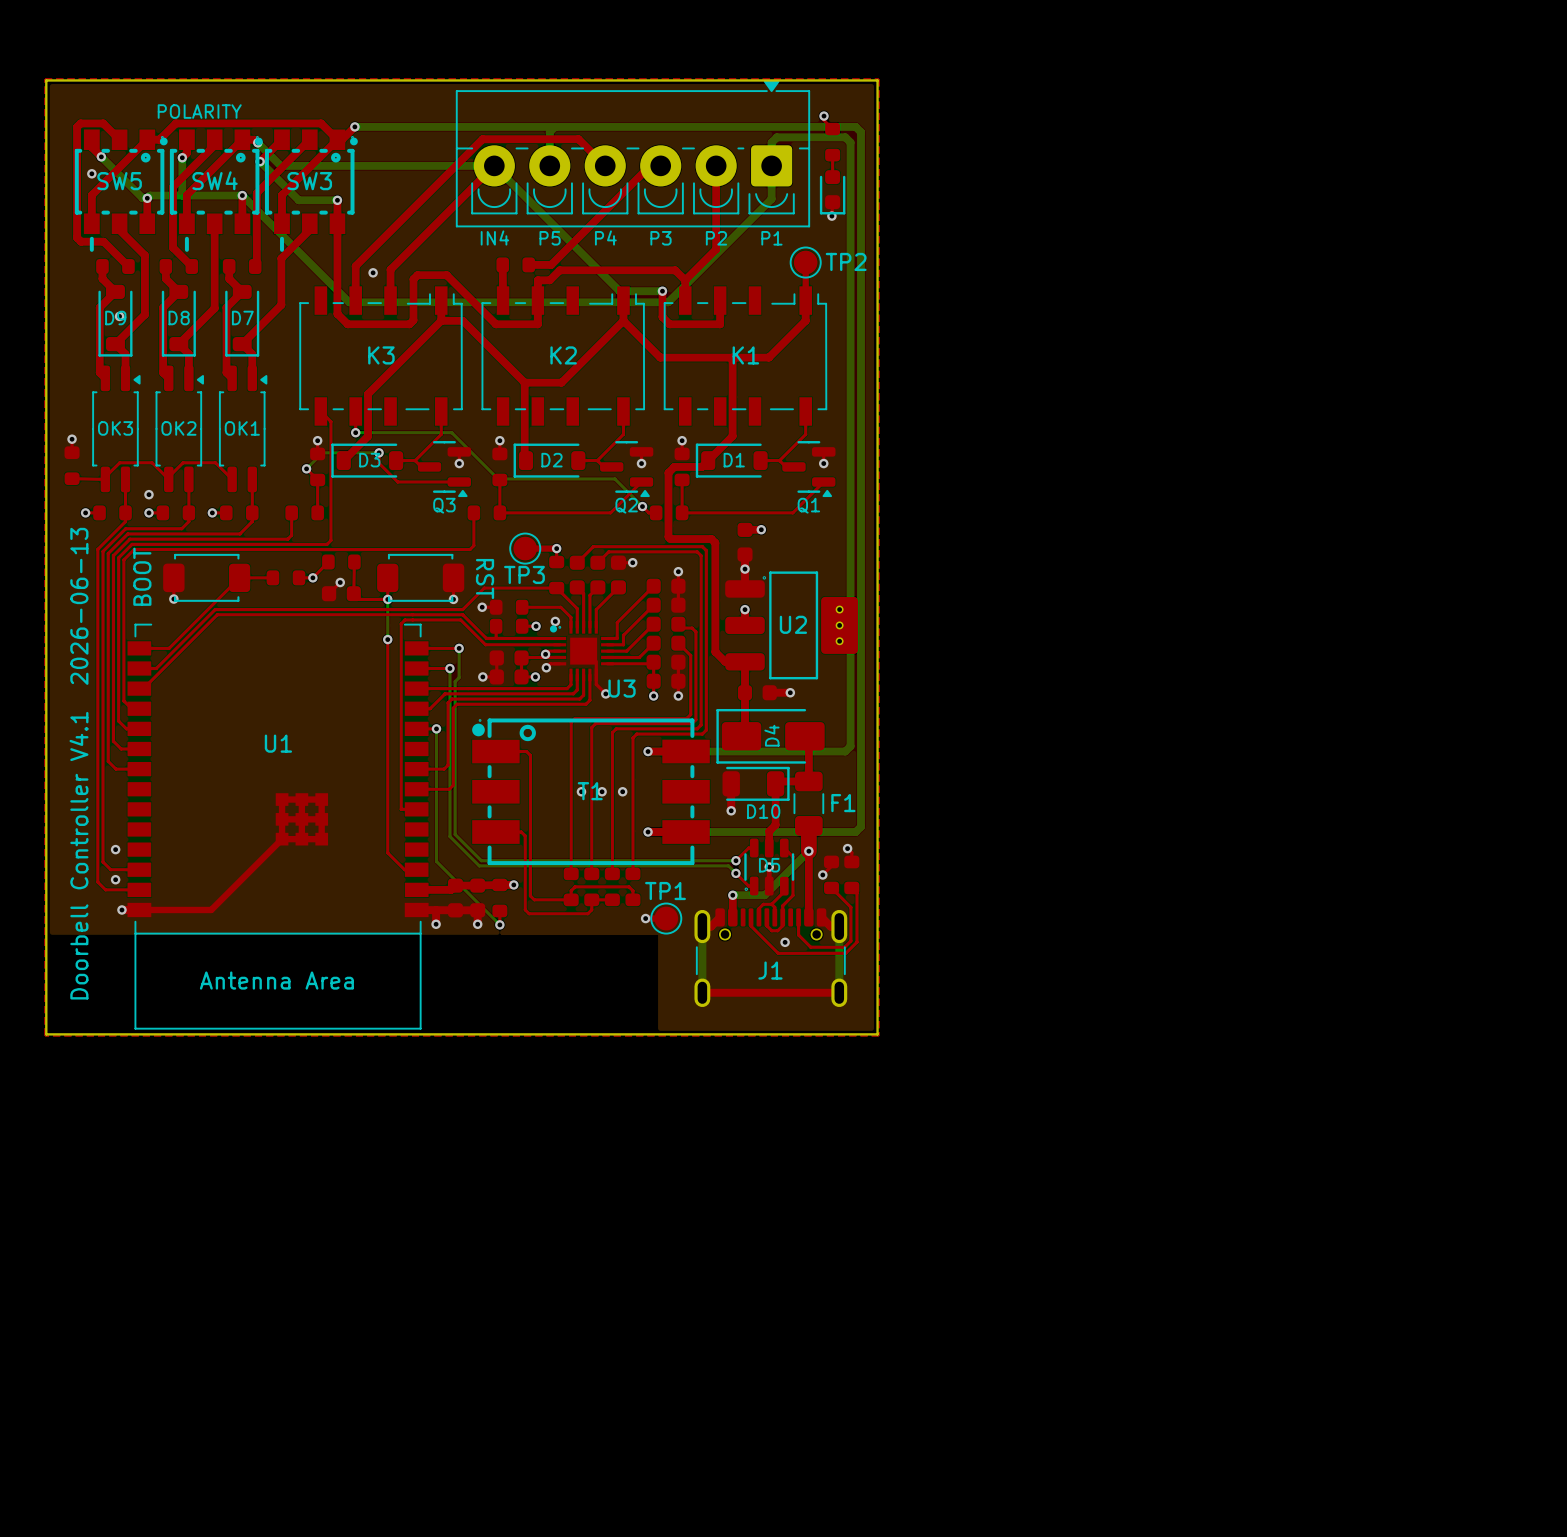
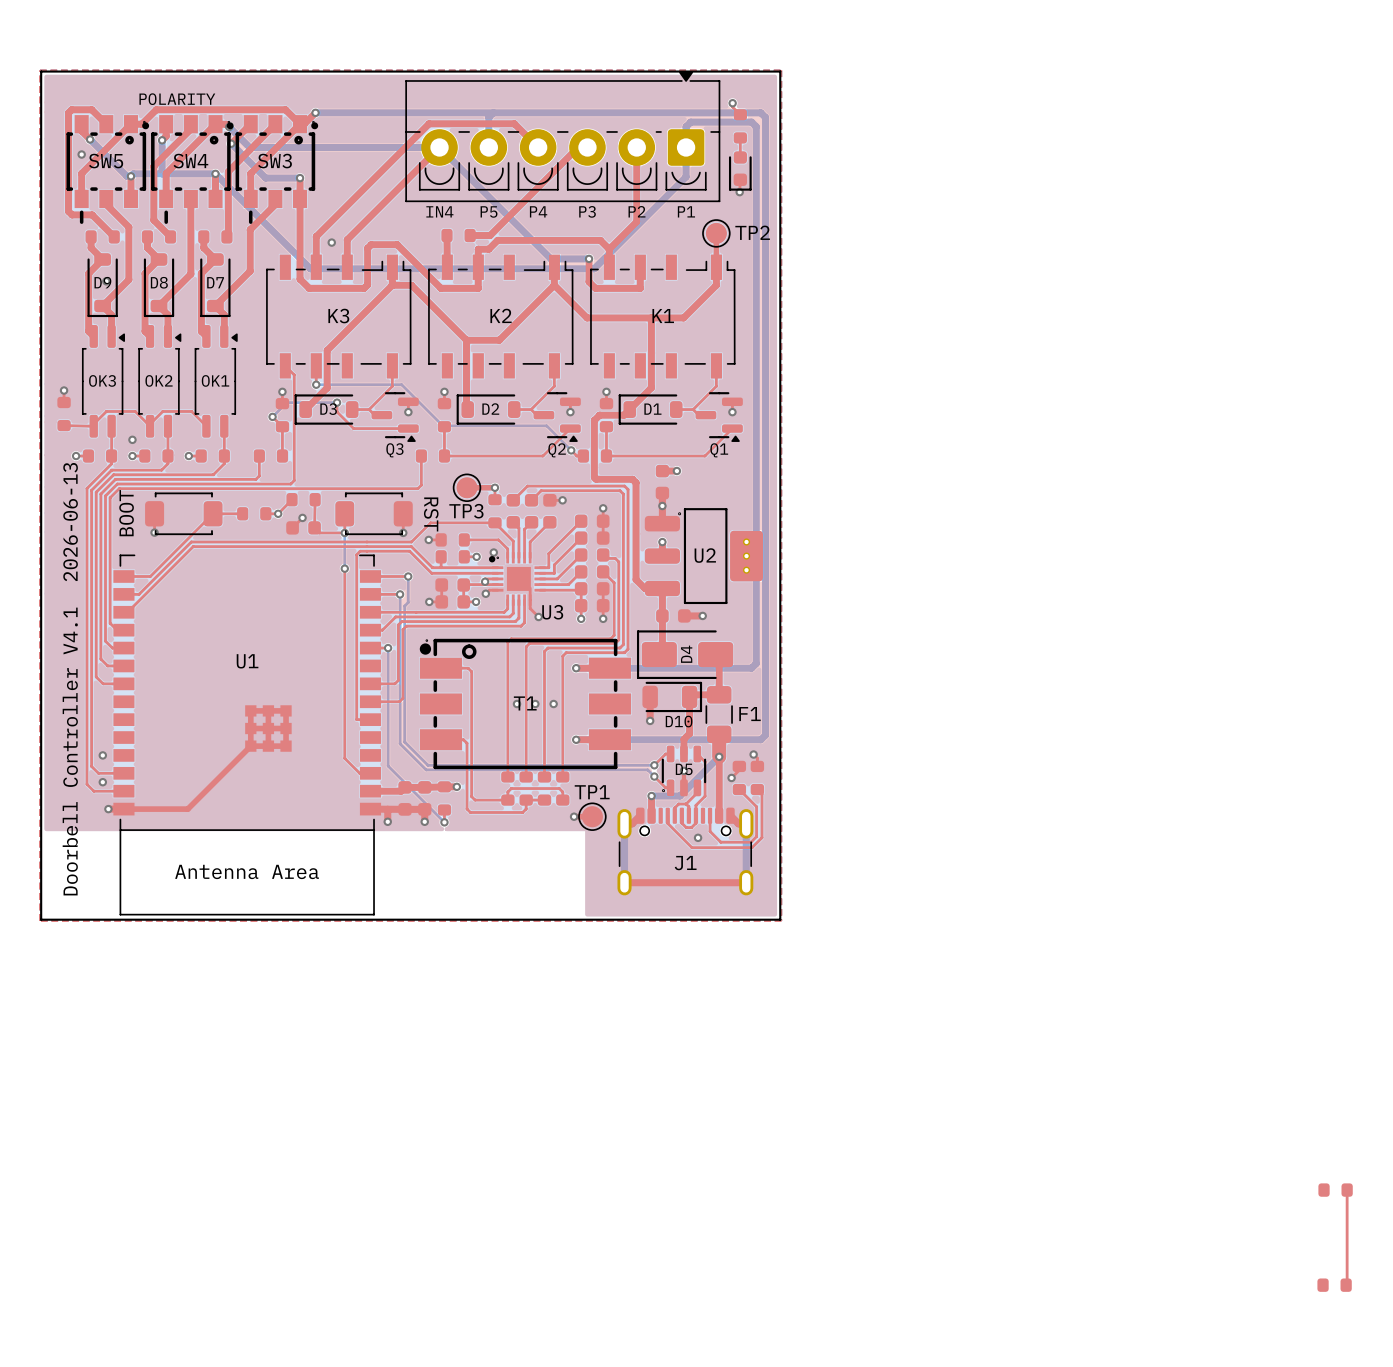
part: none -> (1335, 1190)
top track: none -> (1347, 1190) (1346, 1285)
part: none -> (1334, 1285)

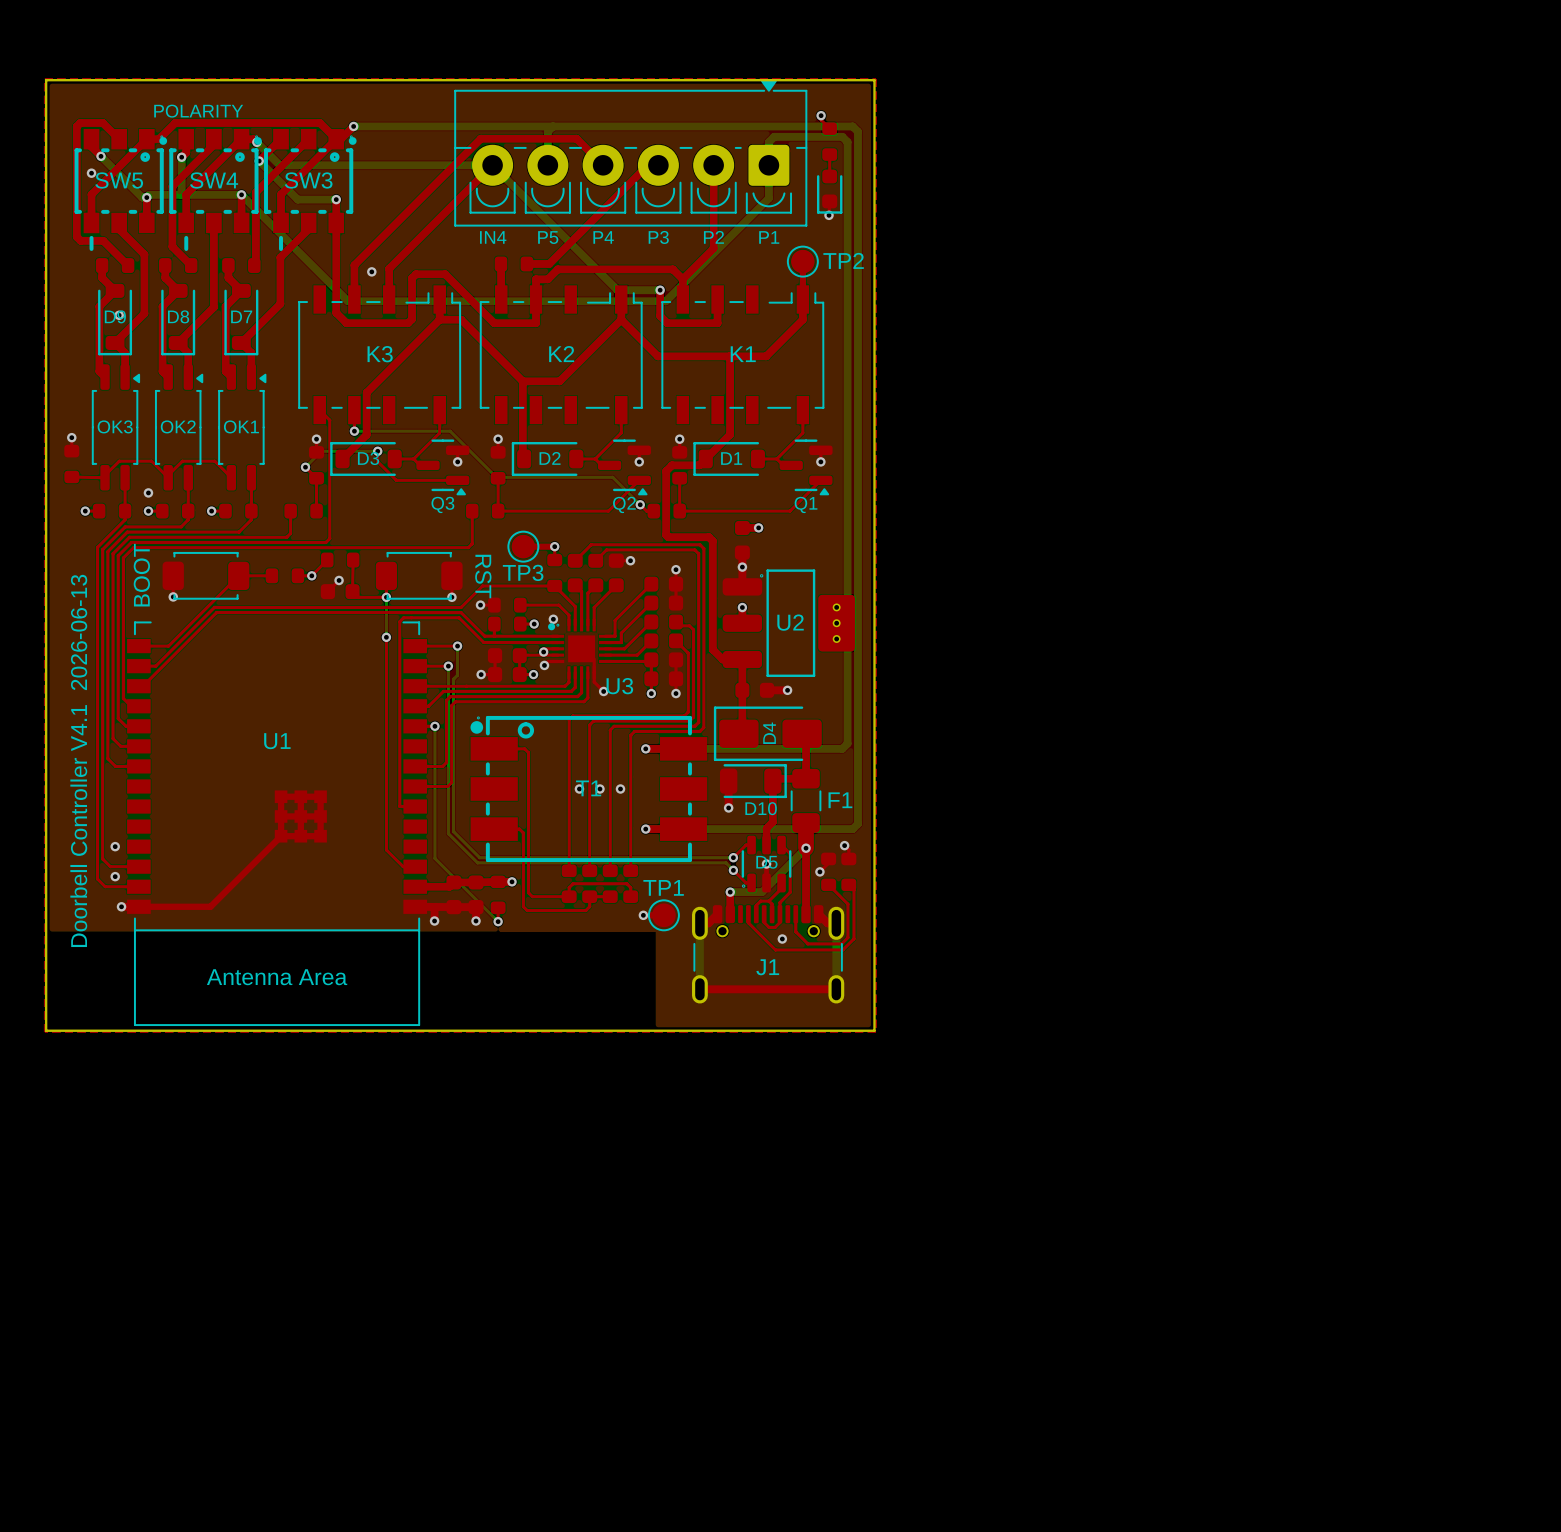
part: (1335, 1190) -> none
top track: (1347, 1190) (1346, 1285) -> none
part: (1334, 1285) -> none

